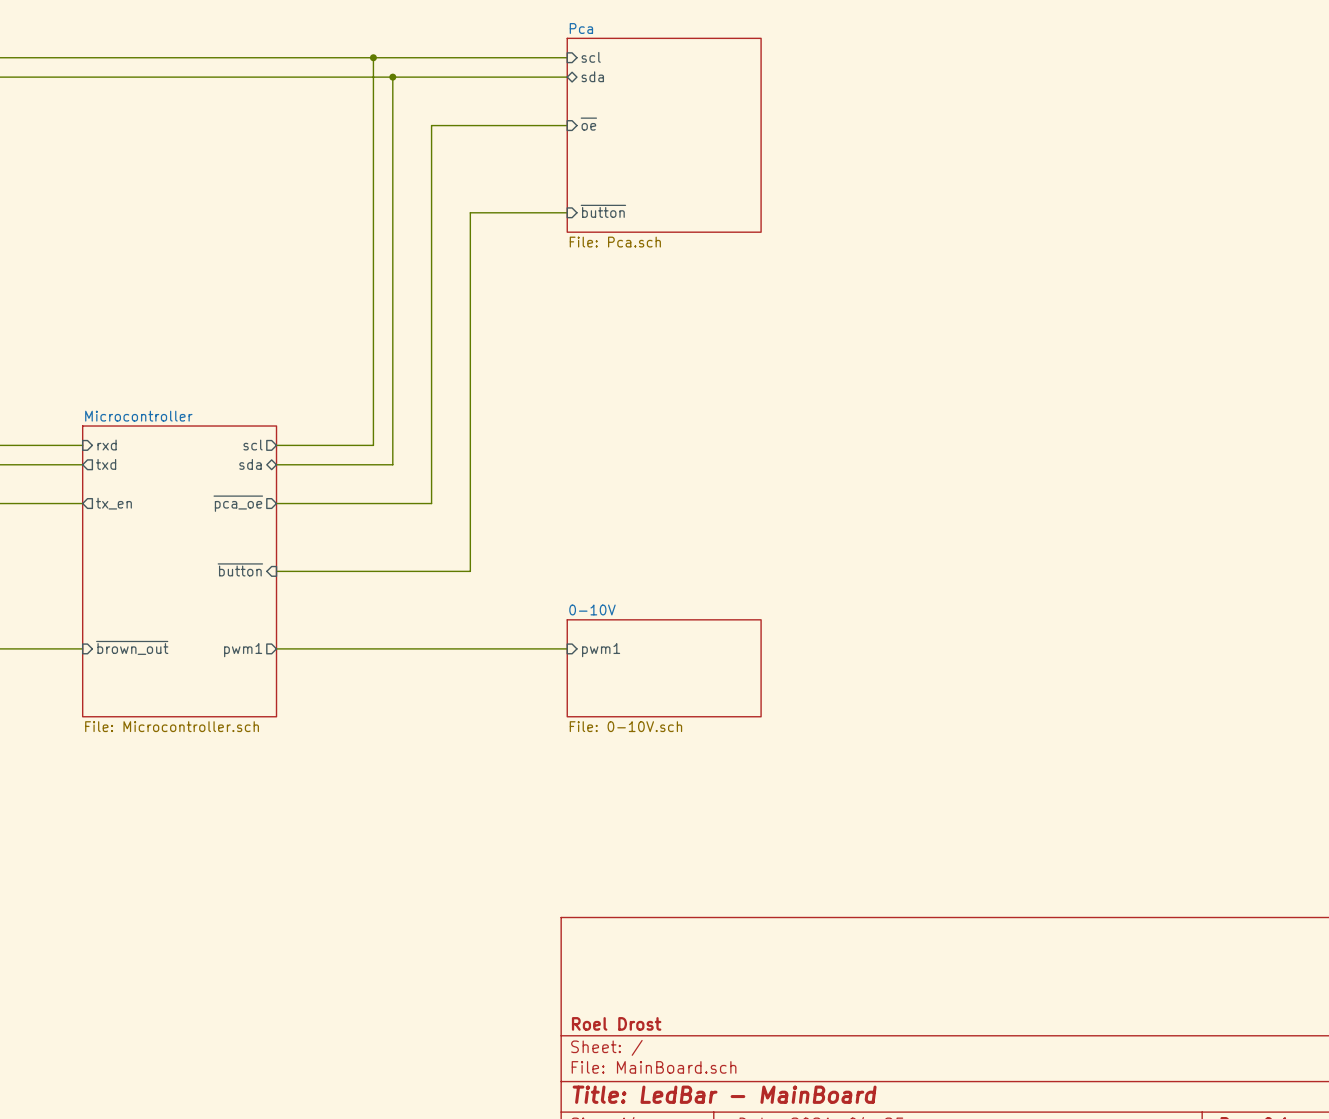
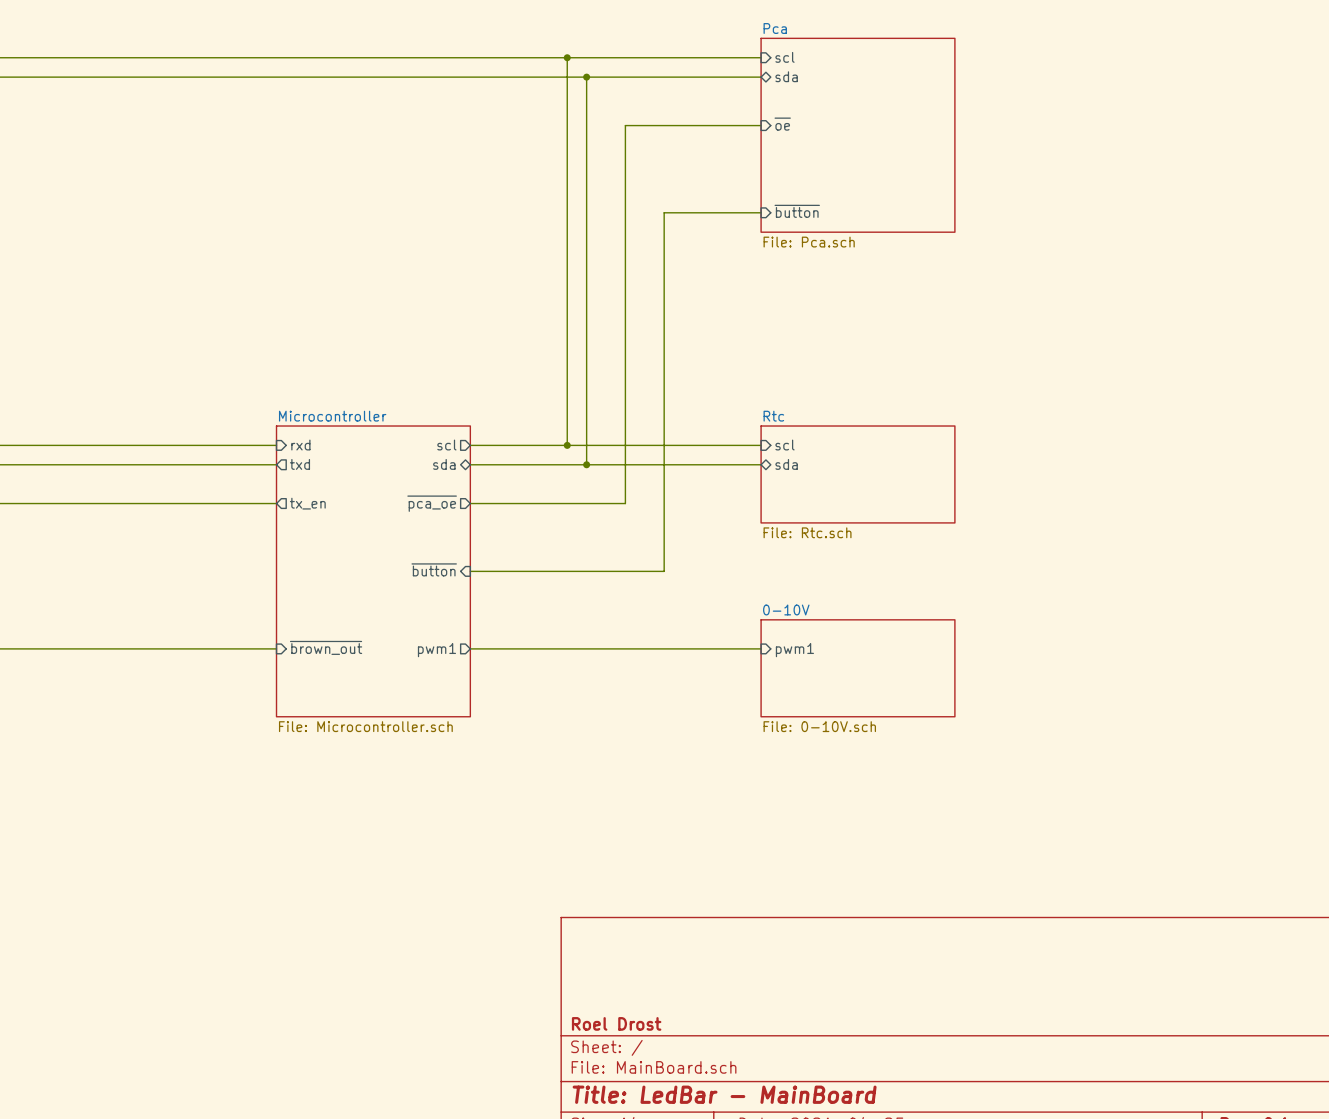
wire: (373, 57) (373, 445) (276, 445) -> (82, 445) (276, 445)
junction: (373, 57) -> none
junction: none -> (567, 57)
sheet pin: scl (591, 57) -> none
wire: none -> (761, 57) (567, 57) (567, 445)
sheet pin: none -> scl (785, 57)
sheet pin: sda (592, 76) -> none
sheet pin: none -> sda (786, 76)
wire: (392, 77) (392, 464) (276, 464) -> (82, 464) (276, 464)
junction: (392, 77) -> none
wire: none -> (567, 77) (761, 77)
wire: none -> (586, 77) (586, 464)
junction: none -> (586, 77)
sheet pin: ~{oe} (588, 124) -> none
sheet pin: none -> ~{oe} (782, 124)
wire: (567, 125) (431, 125) (431, 503) (276, 503) -> (82, 503) (276, 503)
wire: none -> (761, 125) (625, 125) (625, 503) (470, 503)
sheet Pca: File: Pca.sch (664, 135) -> none
sheet Pca: none -> File: Pca.sch (857, 135)
sheet pin: ~{button} (603, 211) -> none
sheet pin: none -> ~{button} (797, 211)
wire: (567, 212) (470, 212) (470, 571) (276, 571) -> none
wire: none -> (761, 212) (664, 212) (664, 571) (470, 571)
sheet pin: rxd (107, 445) -> none
sheet pin: scl (253, 445) -> none
sheet pin: none -> rxd (300, 445)
sheet pin: none -> scl (446, 445)
wire: none -> (470, 445) (761, 445)
junction: none -> (567, 445)
sheet pin: none -> scl (785, 445)
sheet pin: txd (106, 464) -> none
sheet pin: sda (250, 464) -> none
sheet pin: none -> txd (299, 464)
sheet pin: none -> sda (444, 464)
wire: none -> (470, 464) (761, 464)
junction: none -> (586, 464)
sheet pin: none -> sda (786, 464)
sheet Rtc: none -> File: Rtc.sch (857, 474)
sheet pin: tx_en (113, 503) -> none
sheet pin: ~{pca_oe} (238, 503) -> none
sheet pin: none -> tx_en (307, 503)
sheet pin: none -> ~{pca_oe} (432, 503)
sheet pin: ~{button} (240, 569) -> none
sheet pin: none -> ~{button} (434, 569)
sheet Microcontroller: File: Microcontroller.sch (179, 571) -> none
sheet Microcontroller: none -> File: Microcontroller.sch (373, 571)
sheet pin: ~{brown_out} (132, 647) -> none
sheet pin: none -> ~{brown_out} (326, 647)
wire: (276, 648) (470, 648) -> (276, 648) (82, 648)
wire: none -> (567, 648) (761, 648)
sheet pin: pwm1 (243, 650) -> none
sheet pin: none -> pwm1 (436, 650)
sheet pin: pwm1 (601, 650) -> none
sheet pin: none -> pwm1 (794, 650)
sheet 0-10V position: (664, 668) -> (857, 668)

